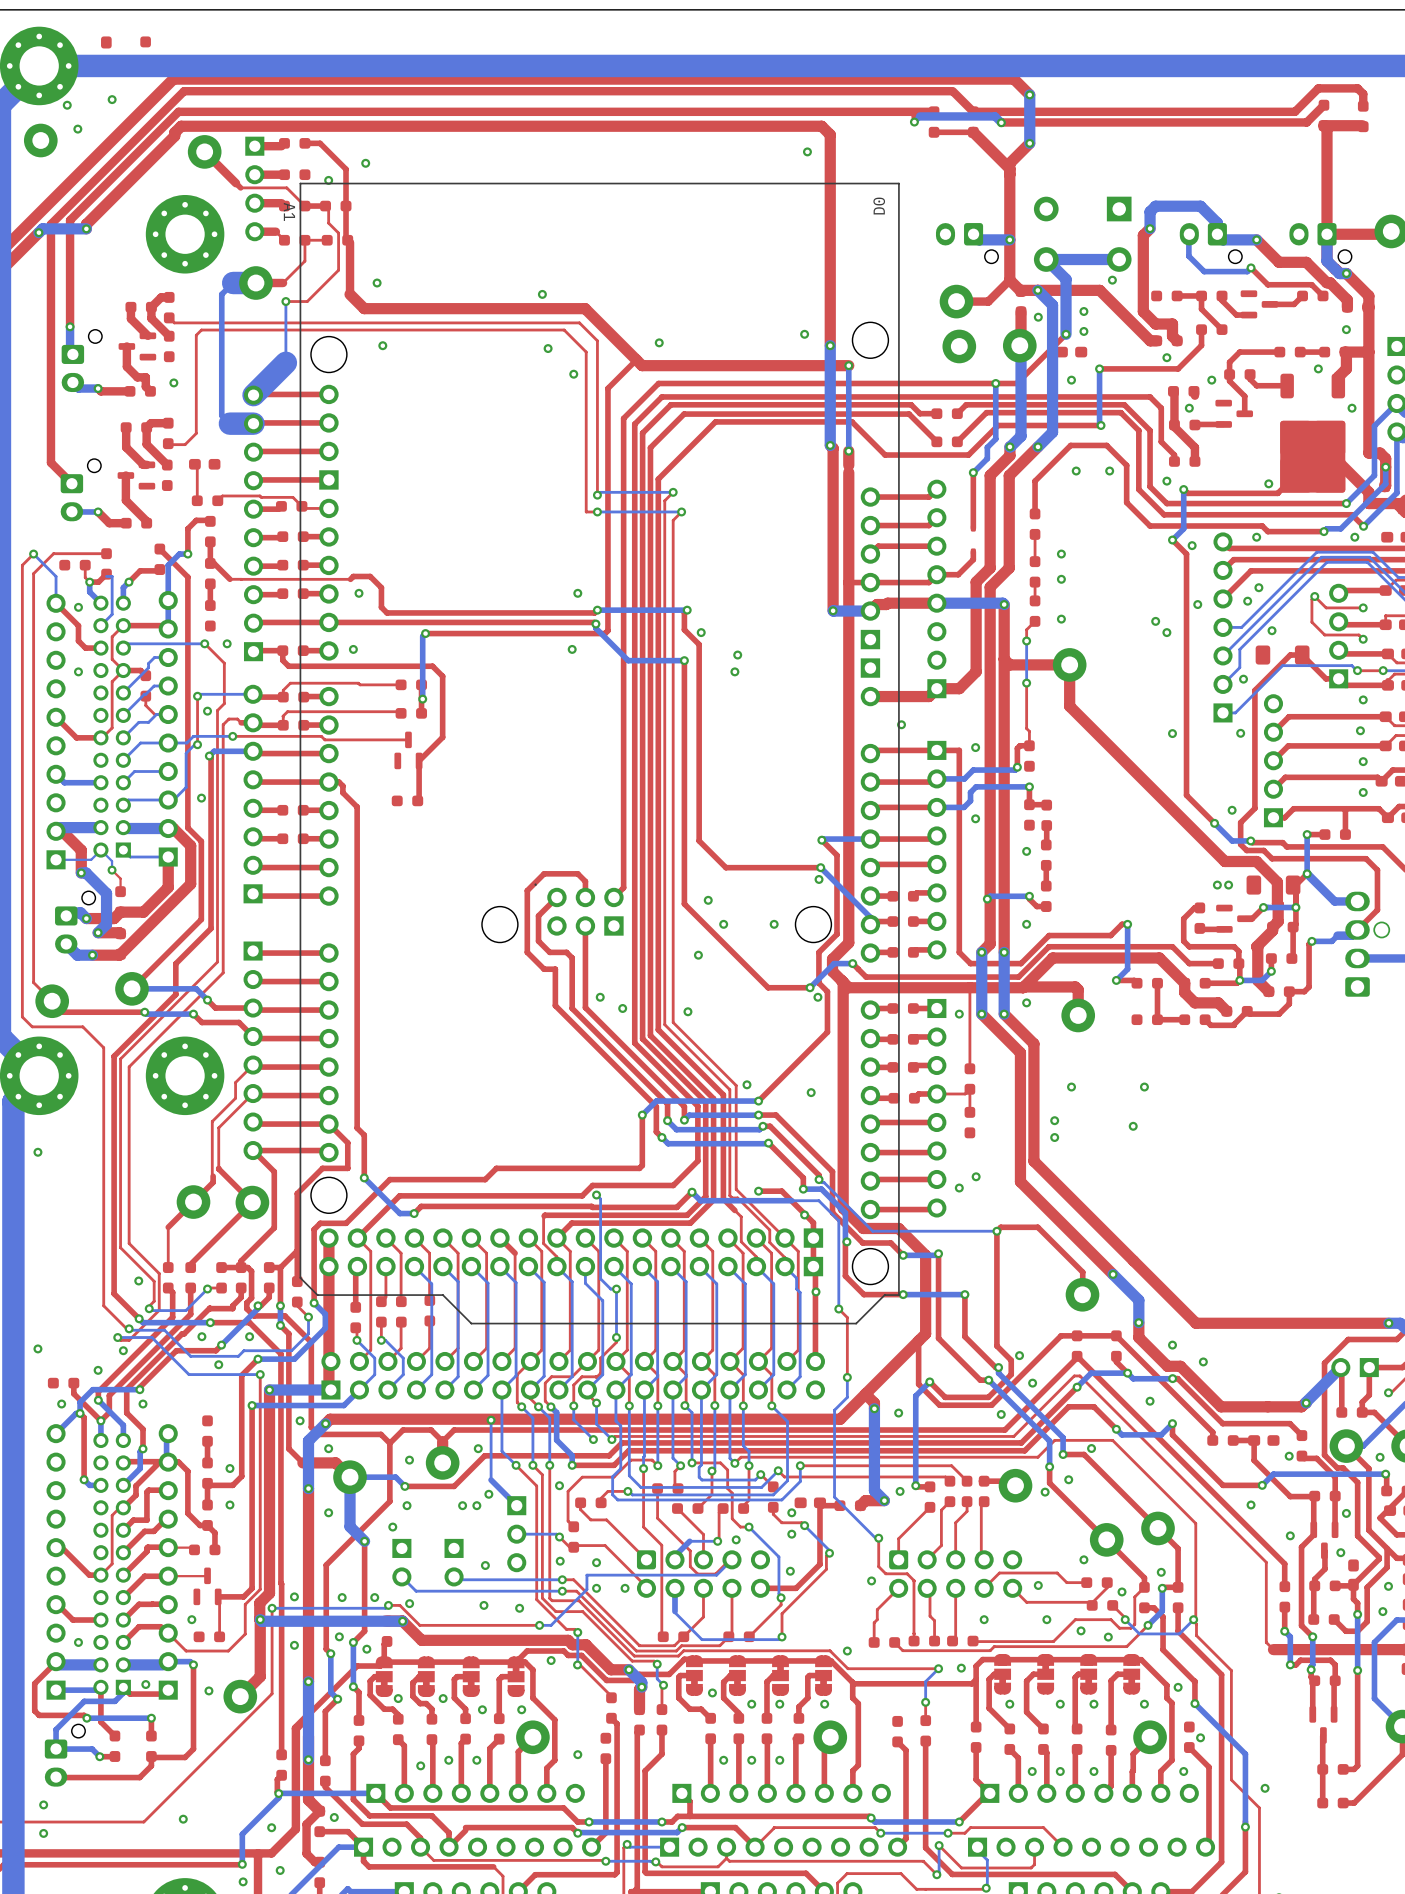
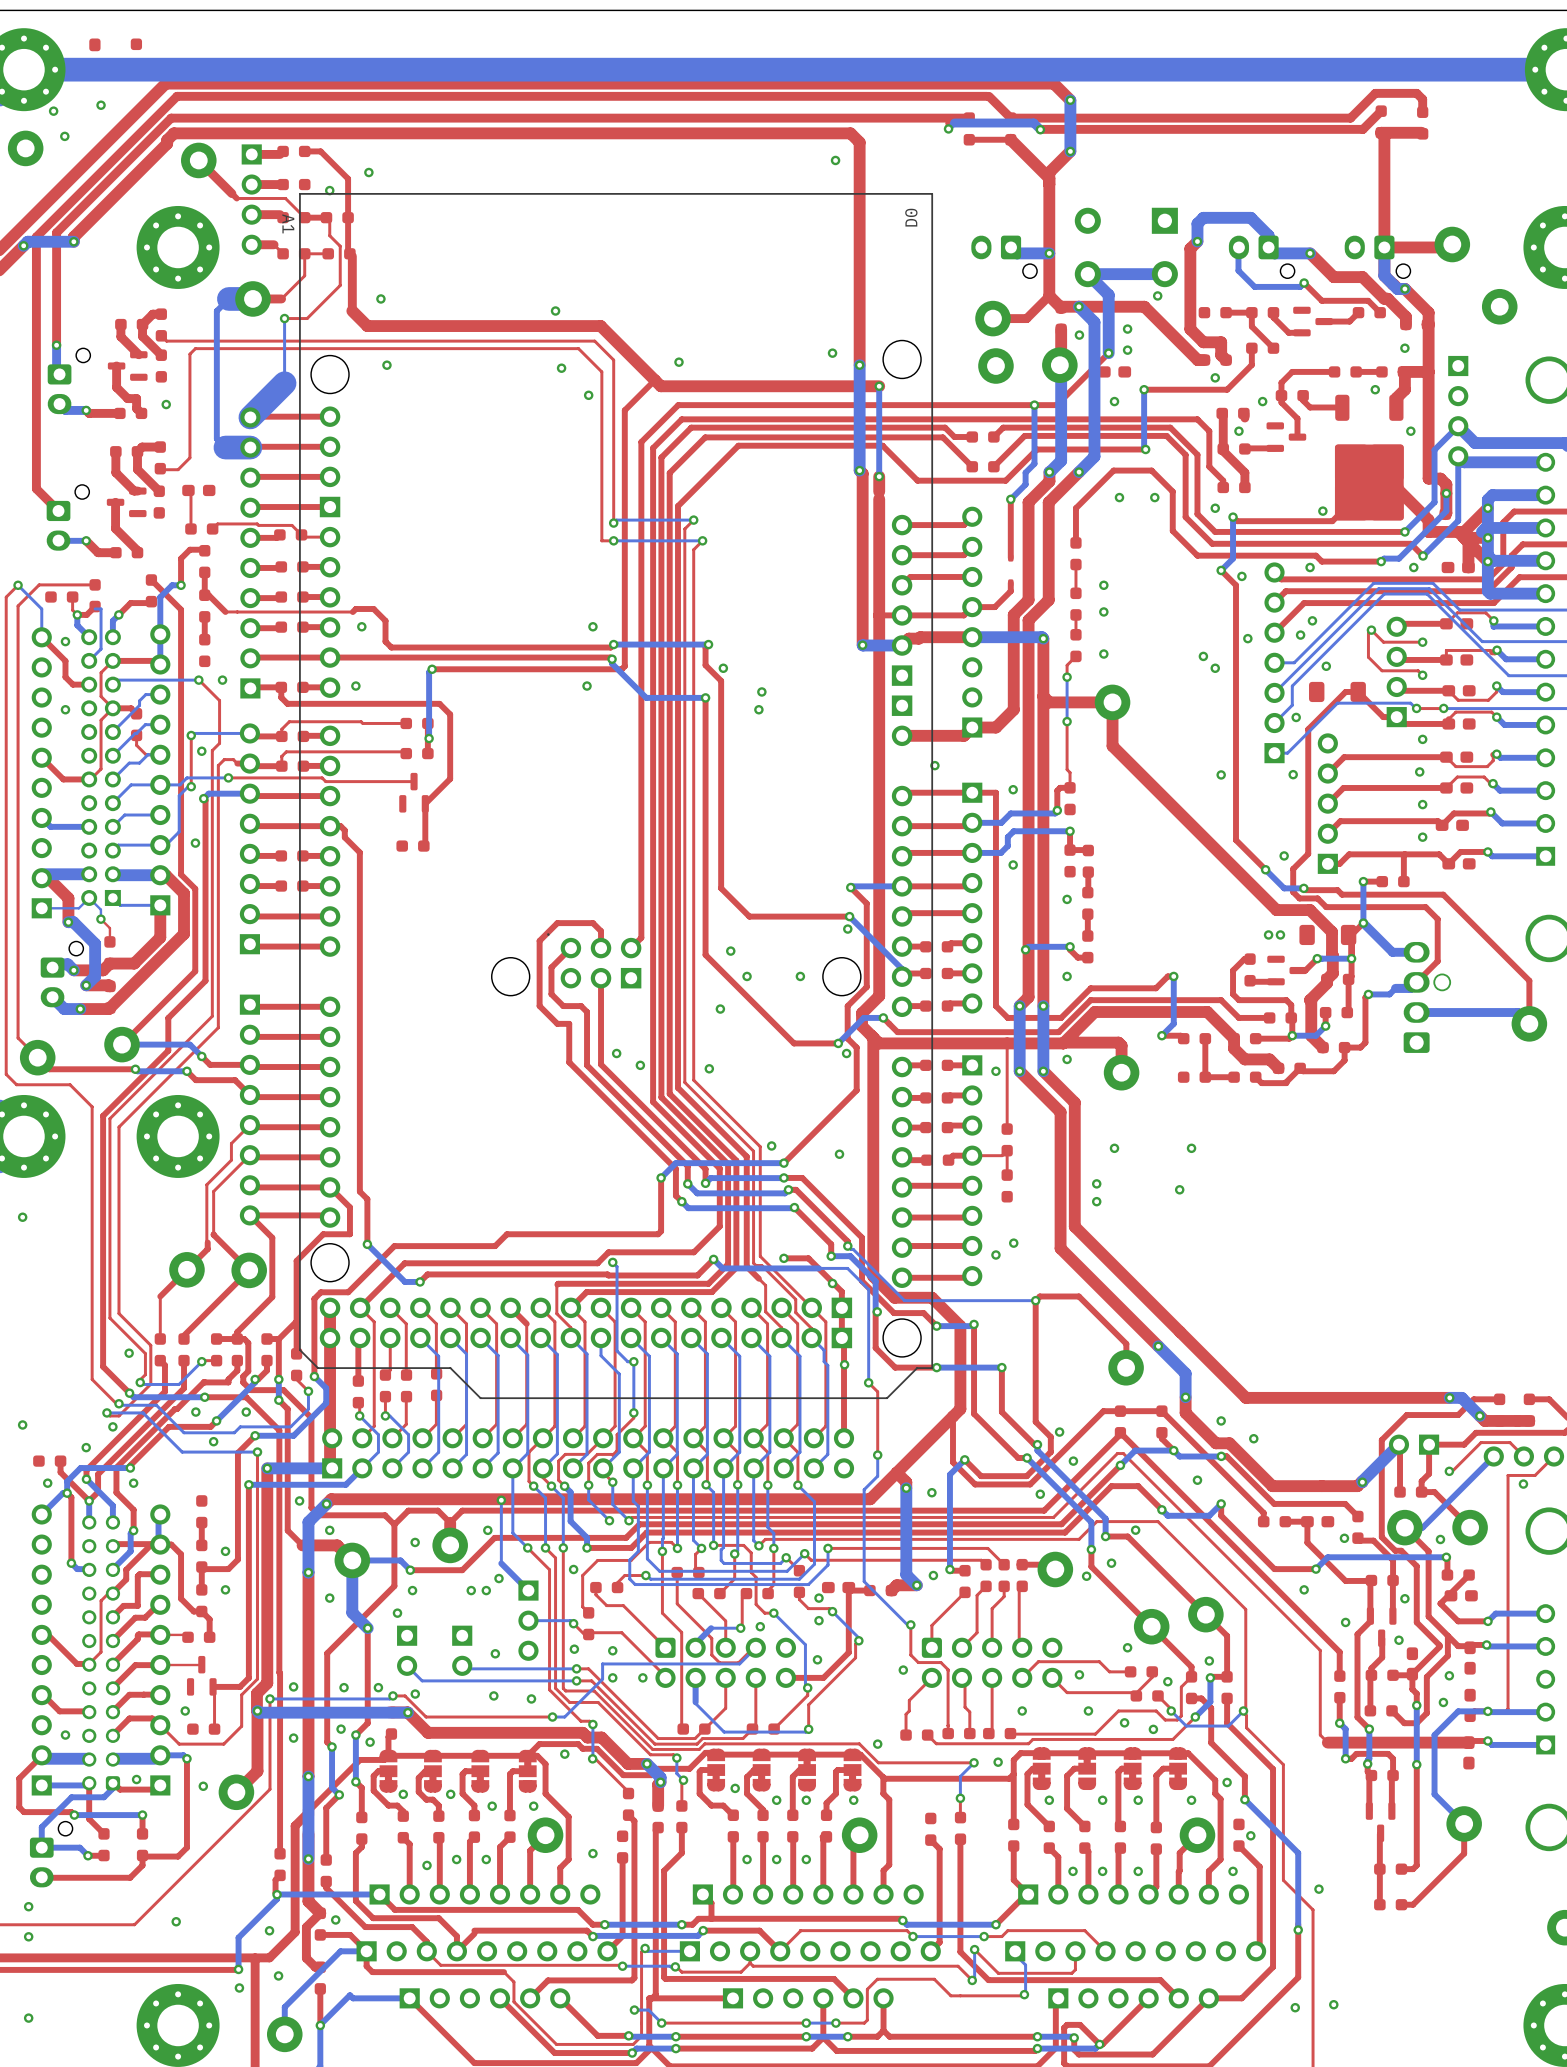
part footprint: [93, 1432, 131, 1695] -> [82, 1515, 121, 1791]

